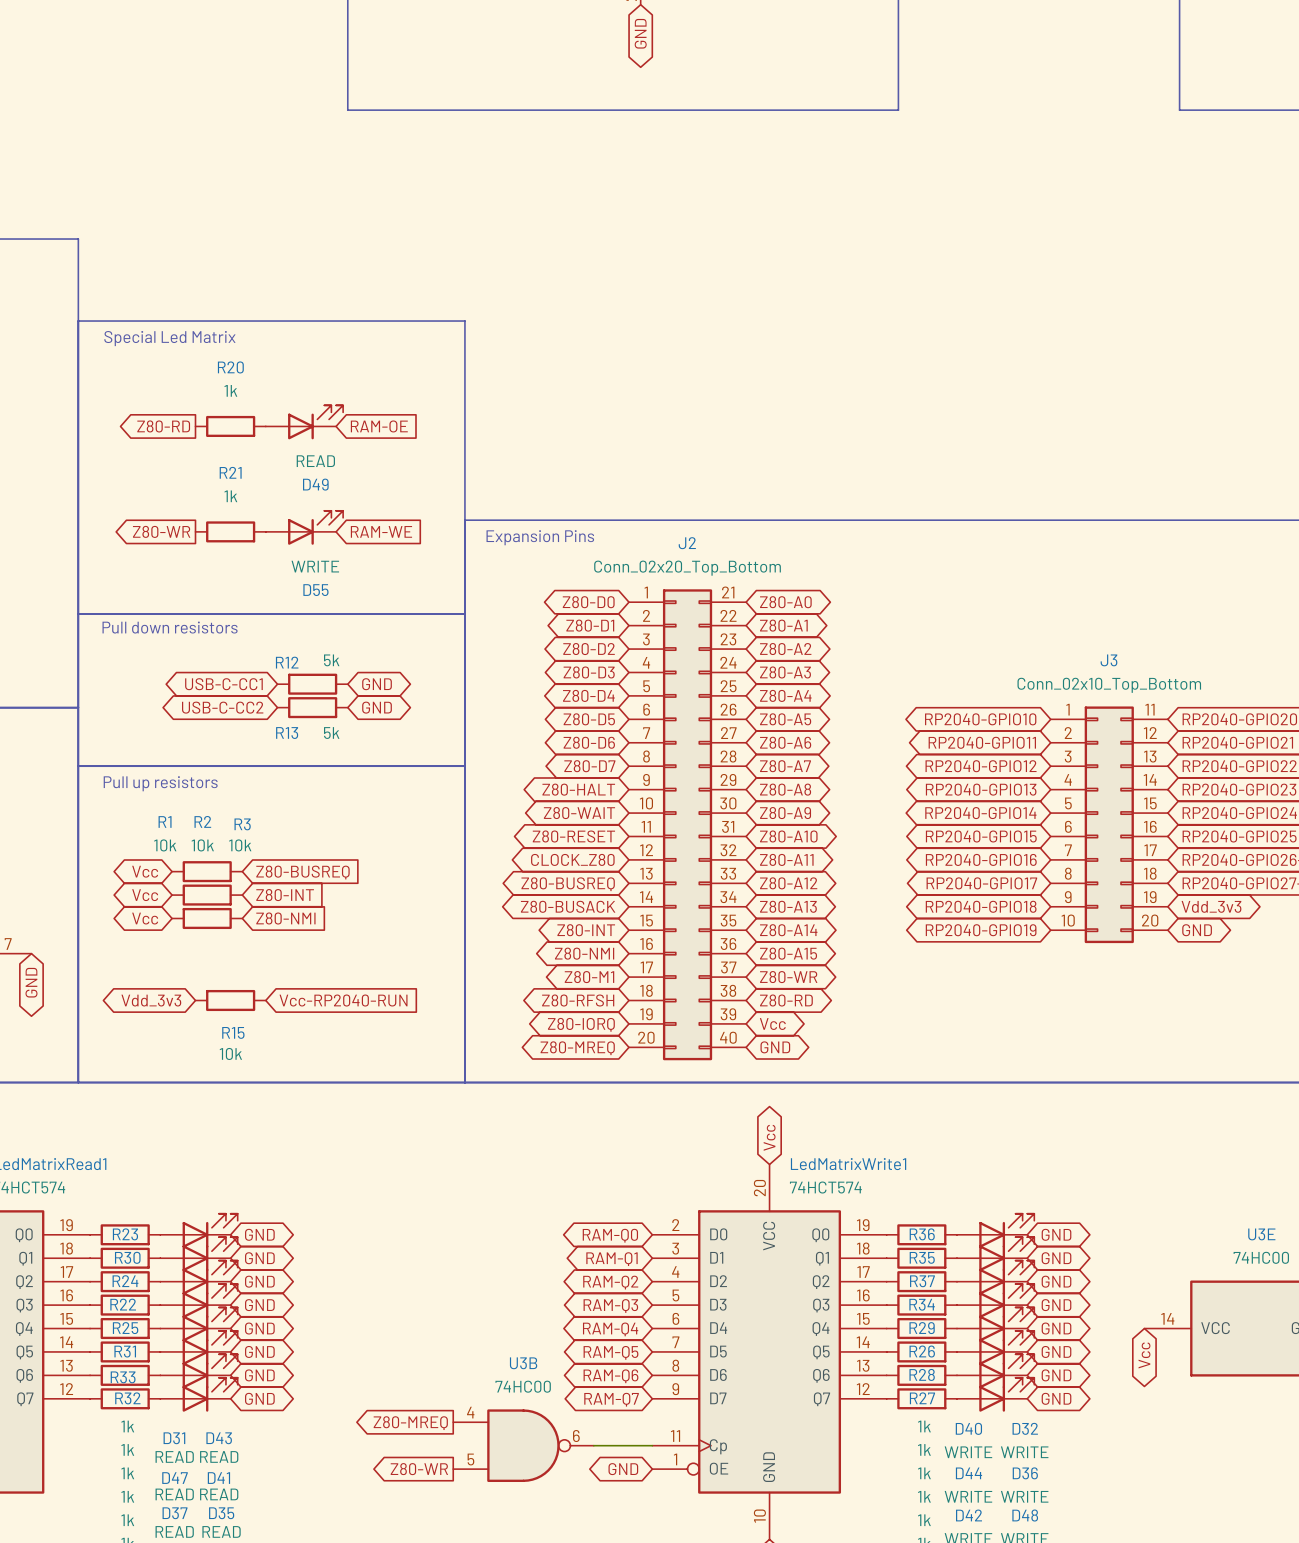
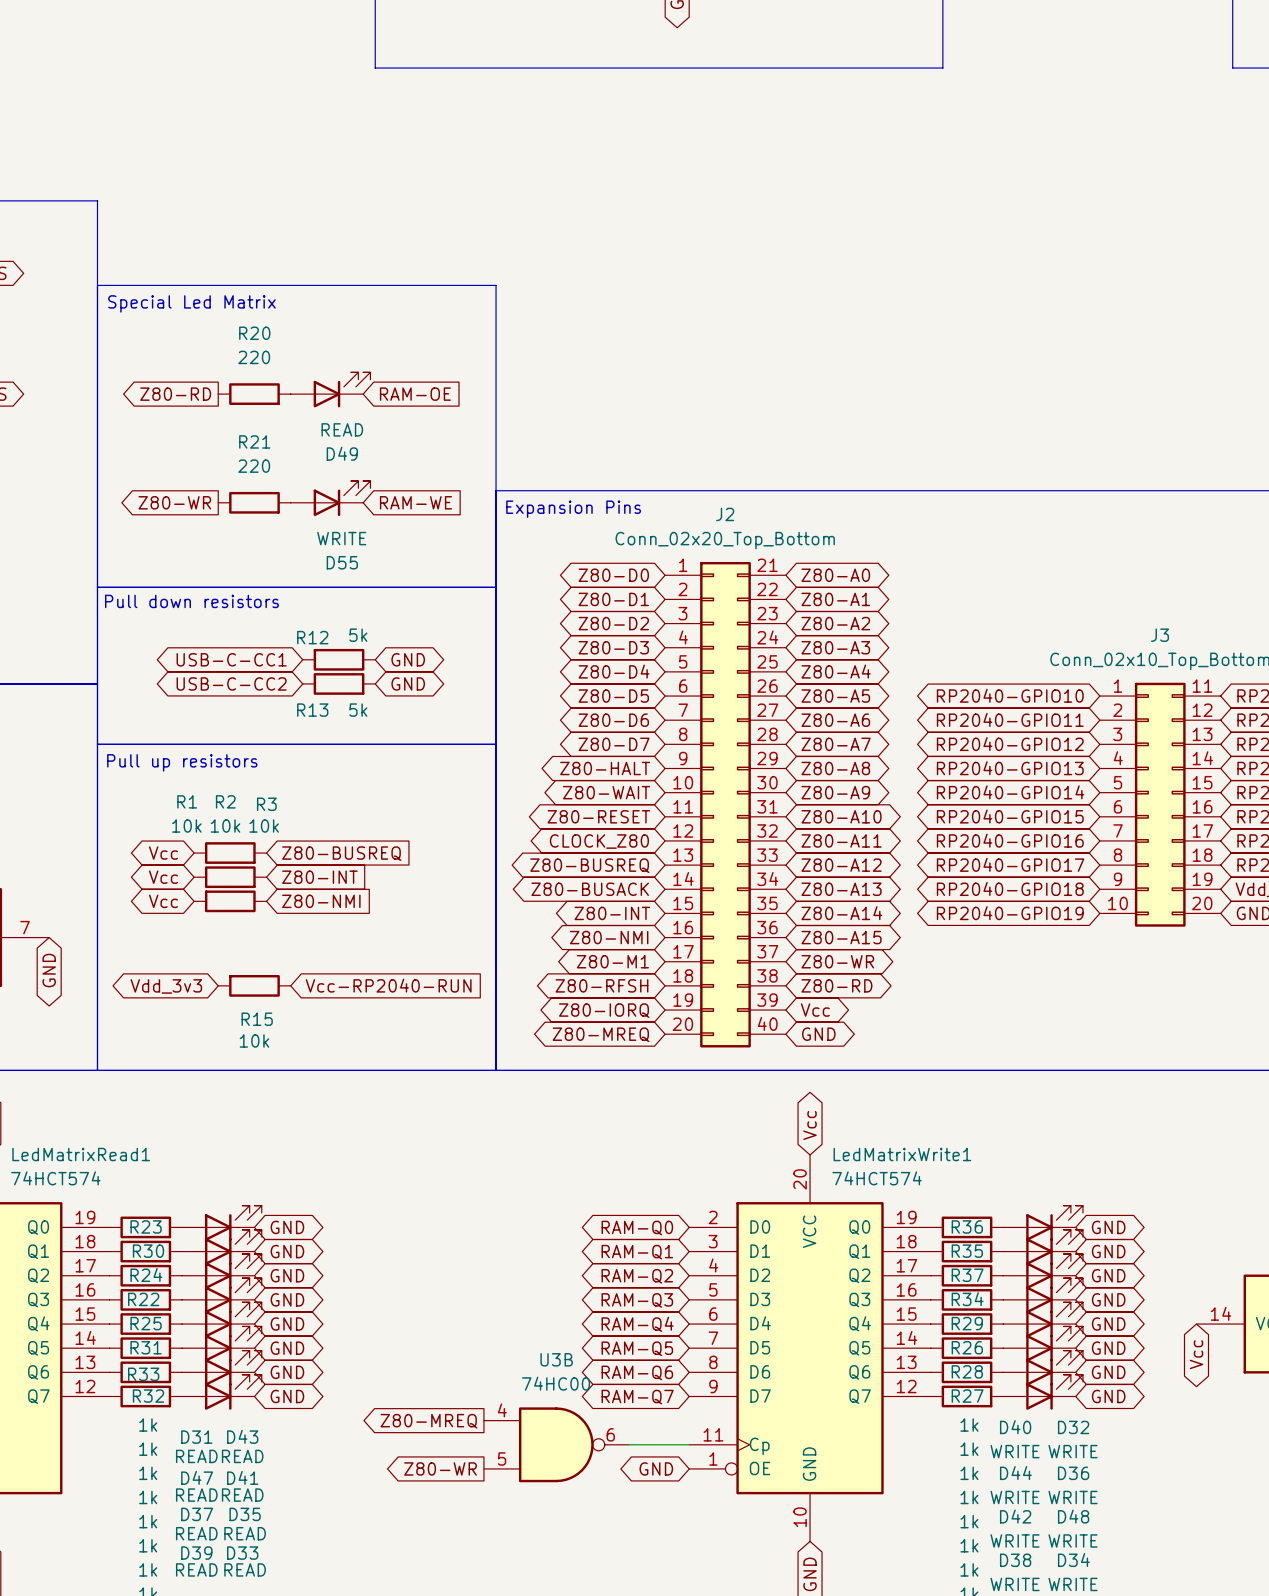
R20 value: 1k (230, 390) -> 220 (254, 357)
R21 value: 1k (230, 496) -> 220 (254, 466)

